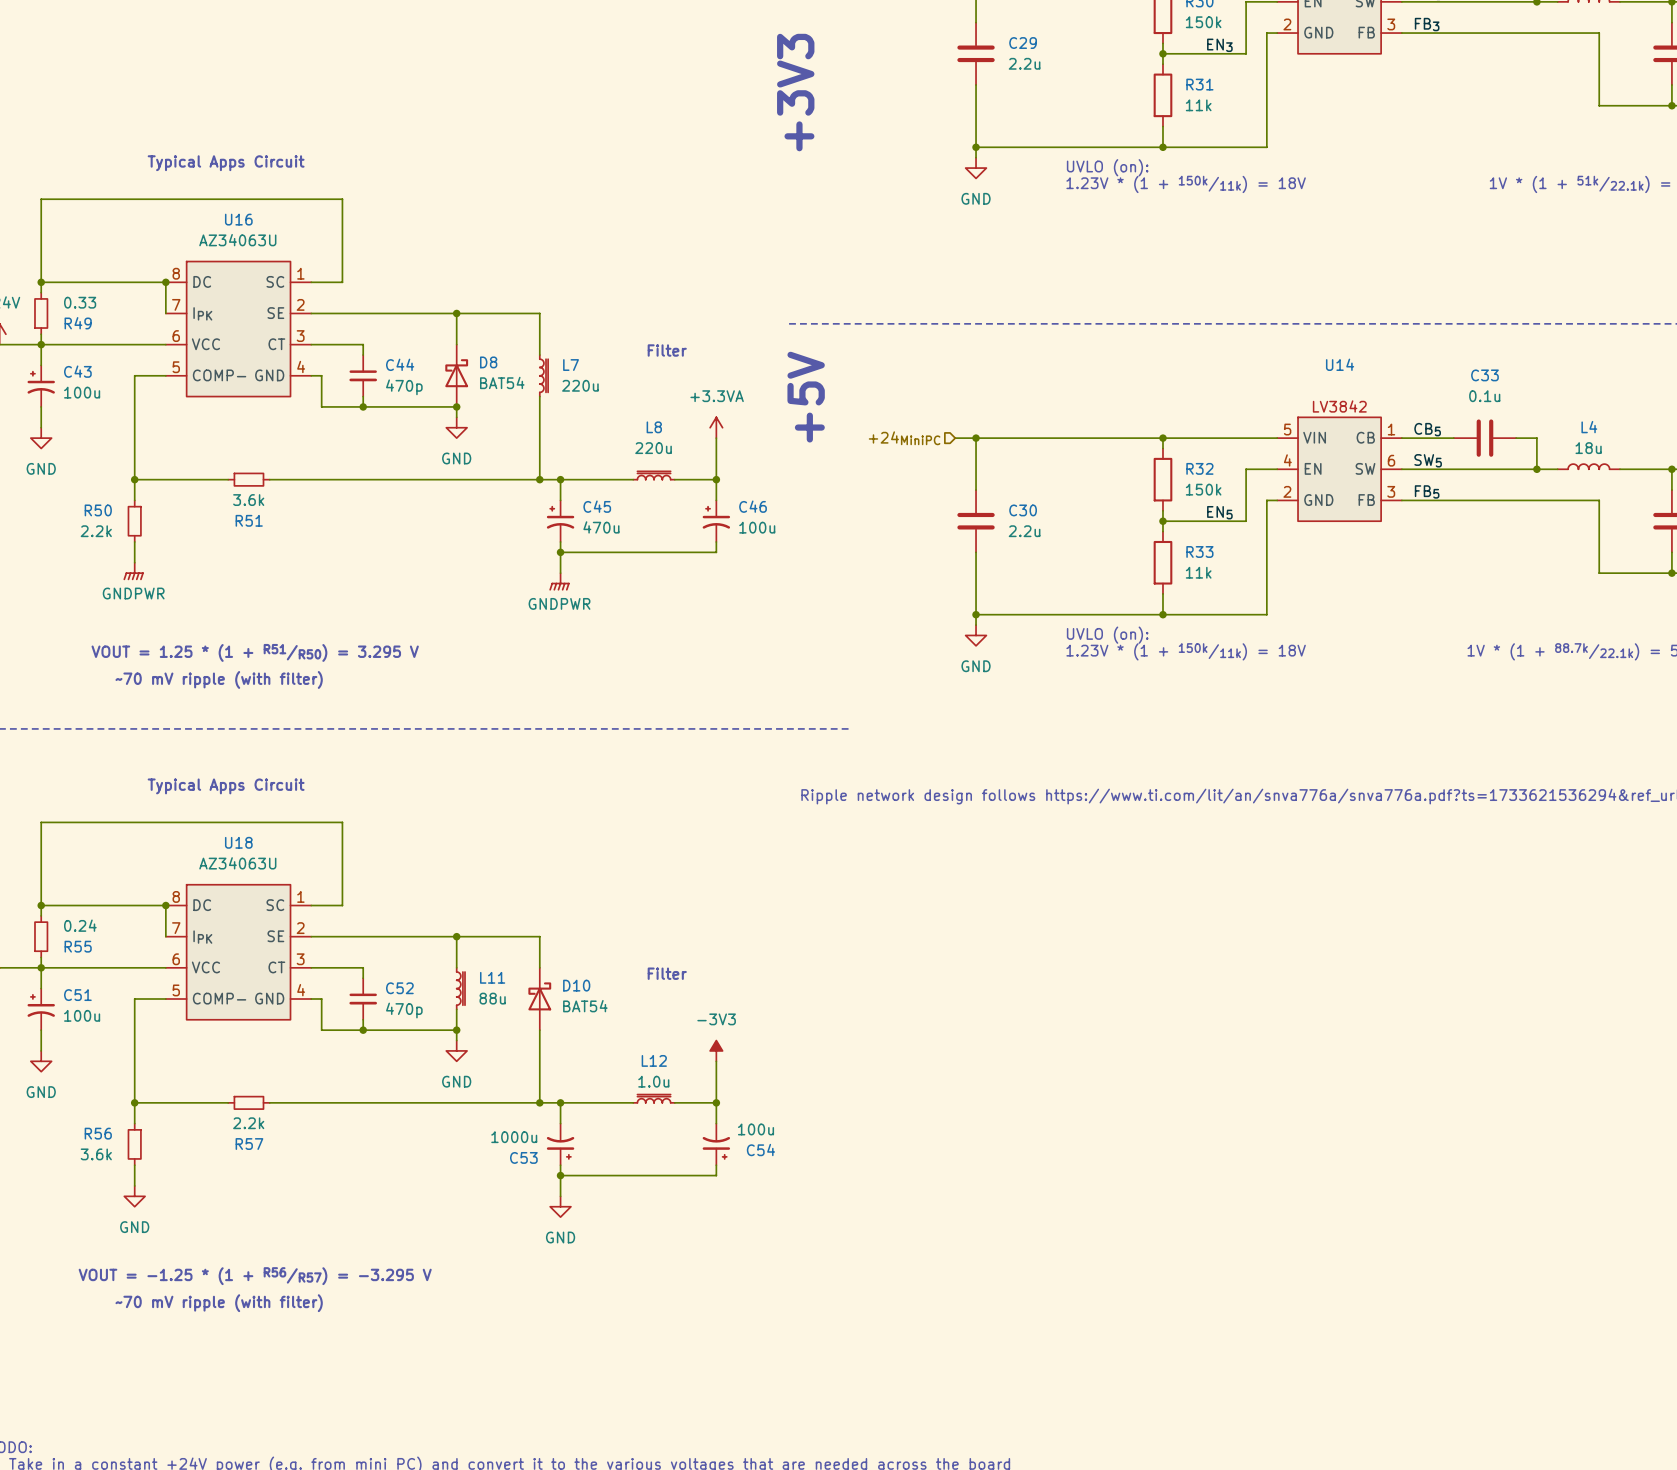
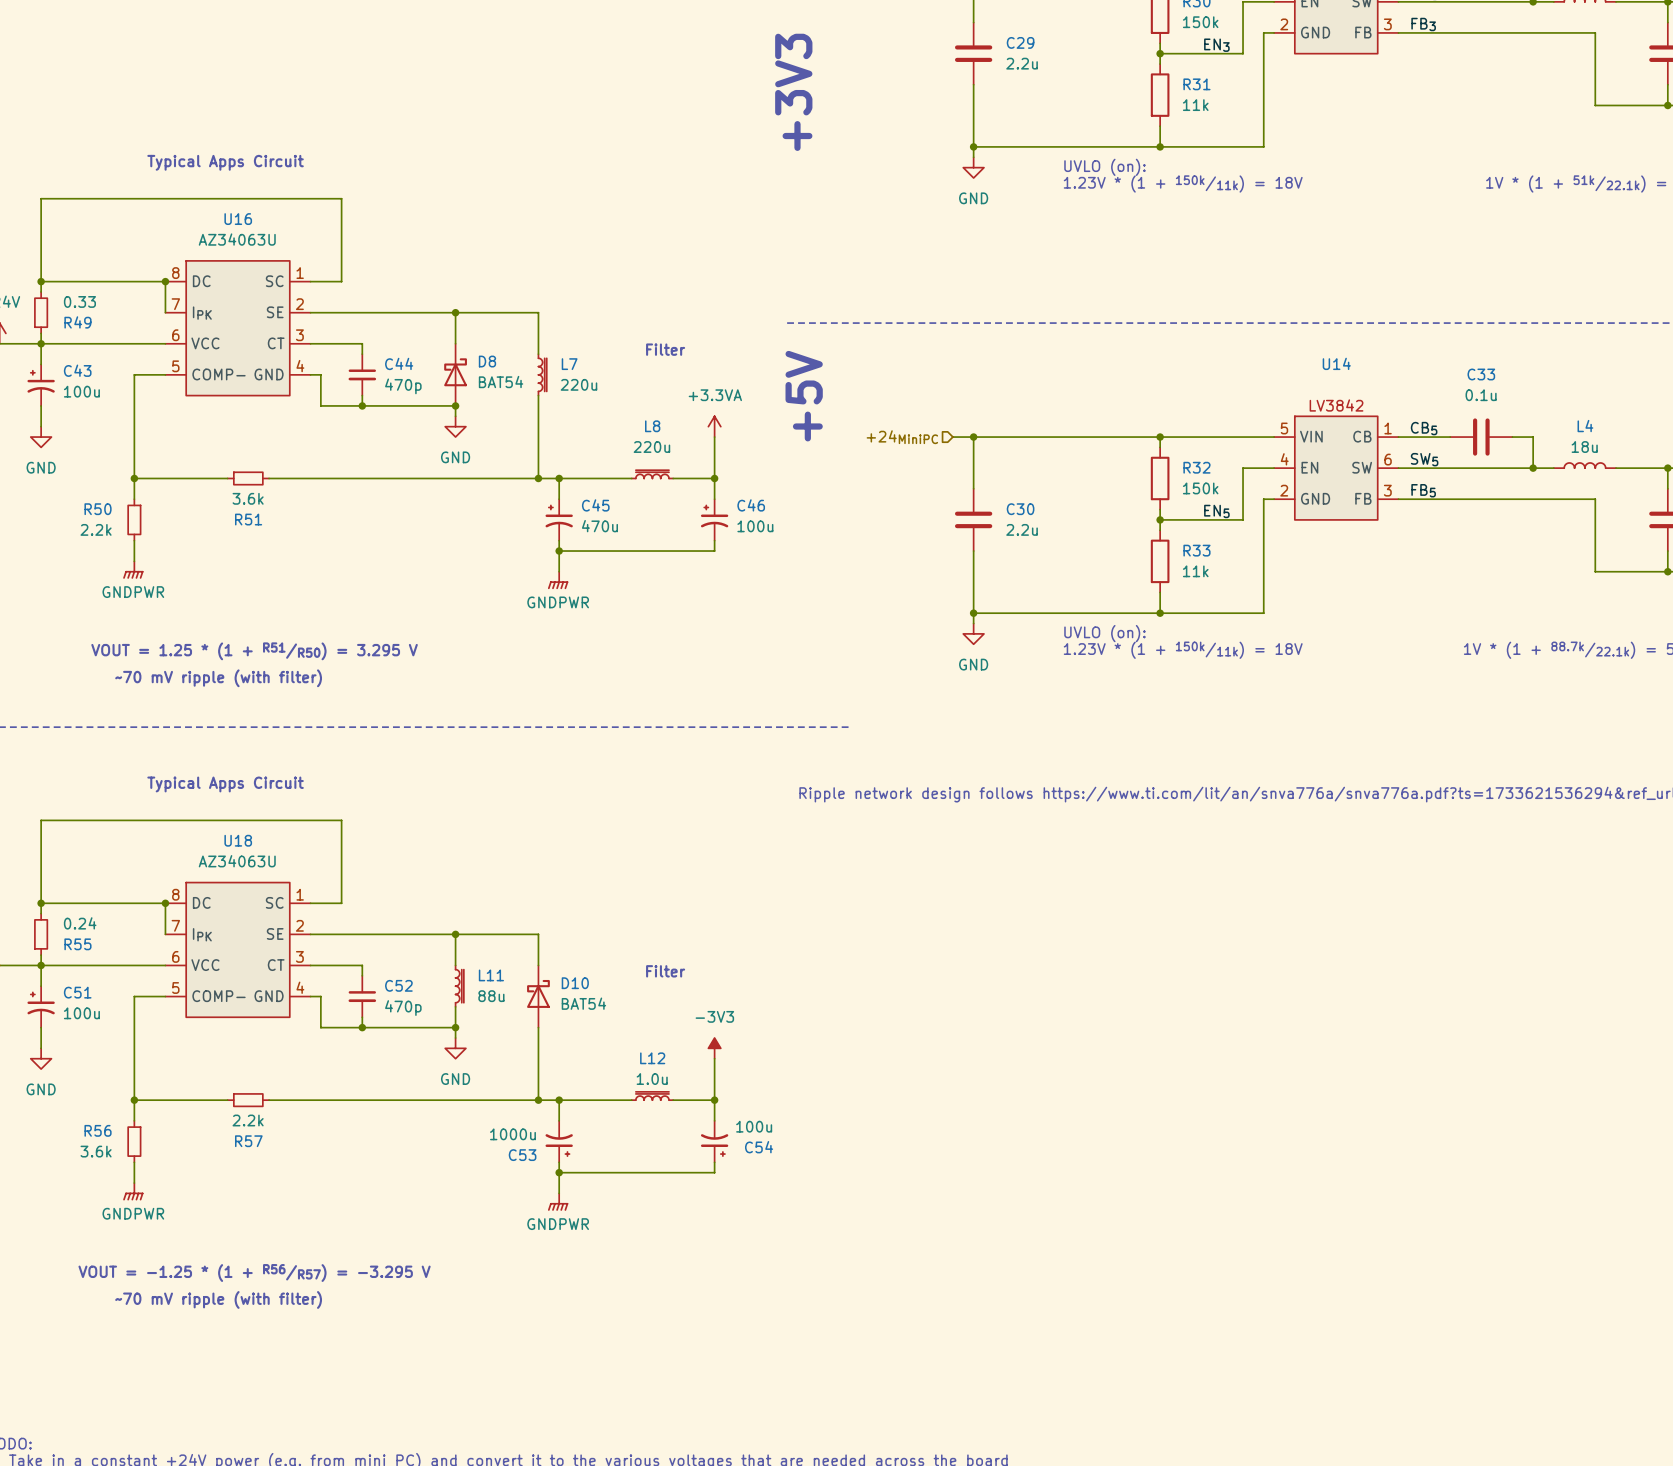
power symbol: GND (134, 1196) -> GNDPWR (133, 1191)
power symbol: GND (560, 1206) -> GNDPWR (558, 1202)

